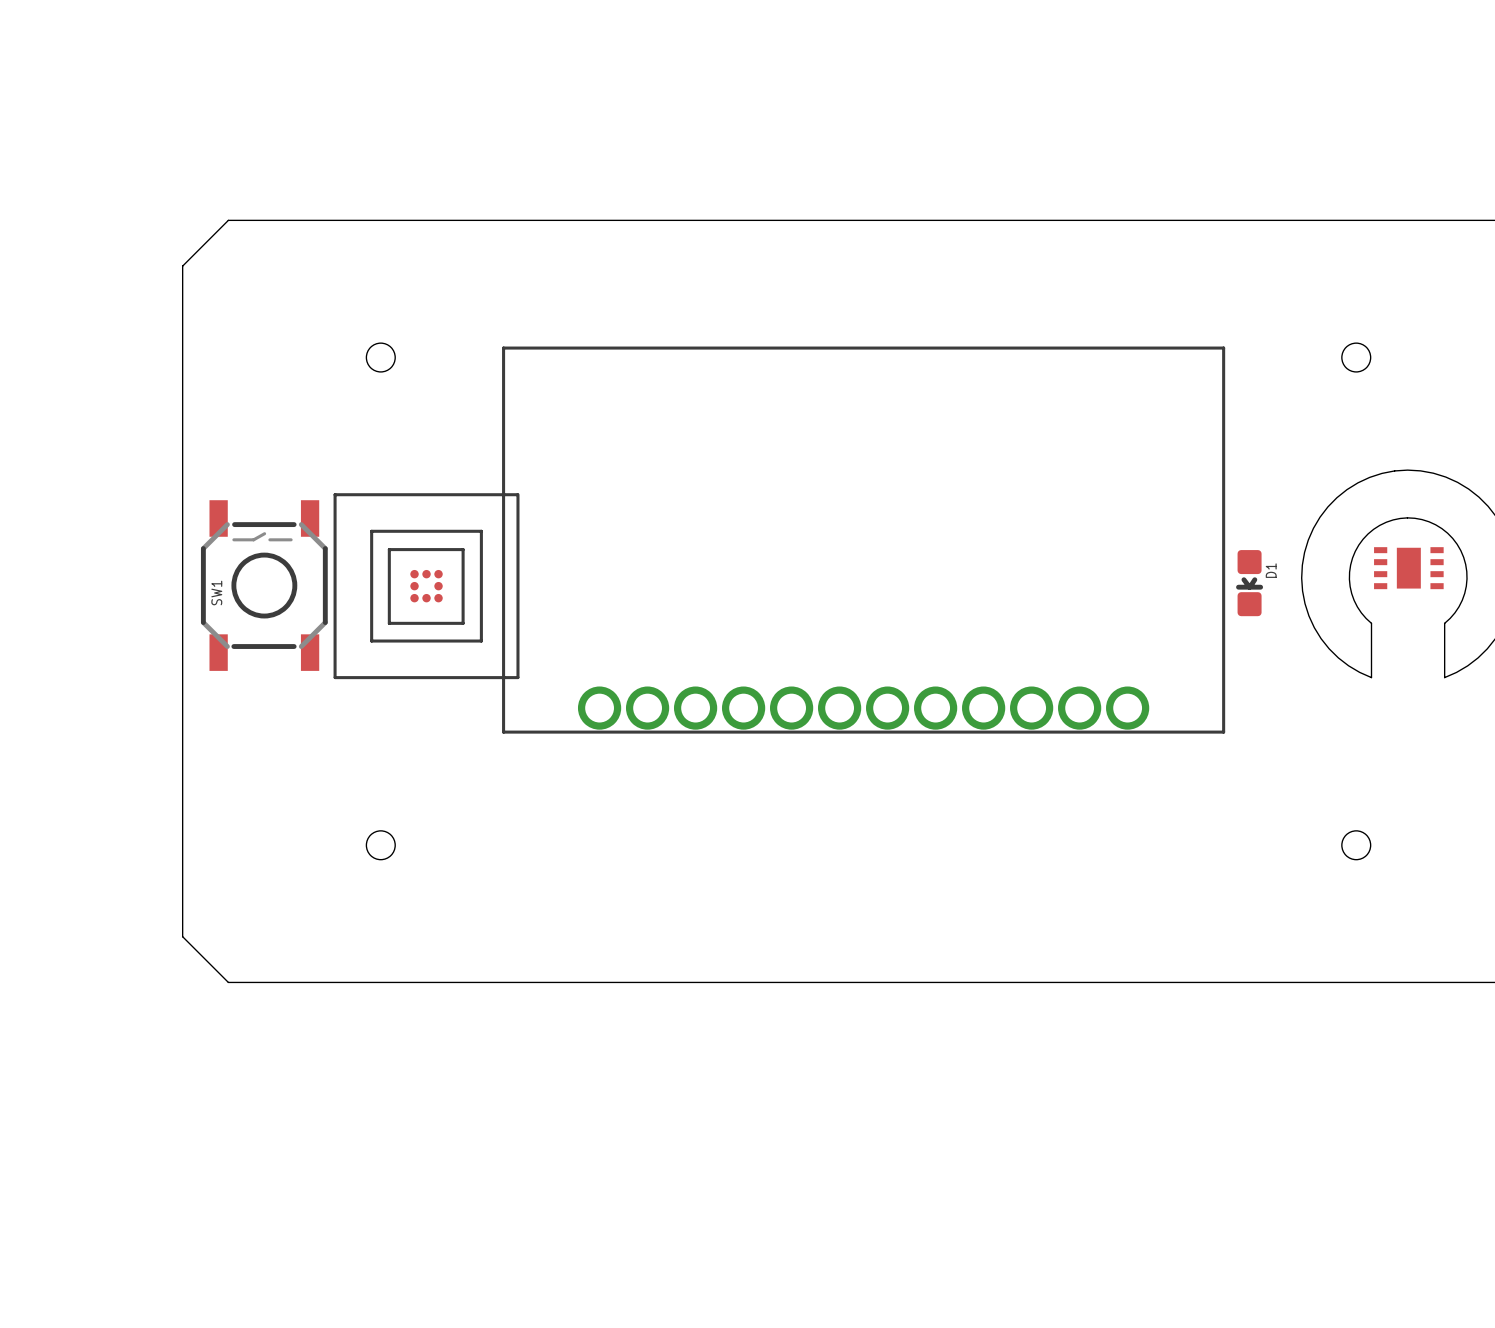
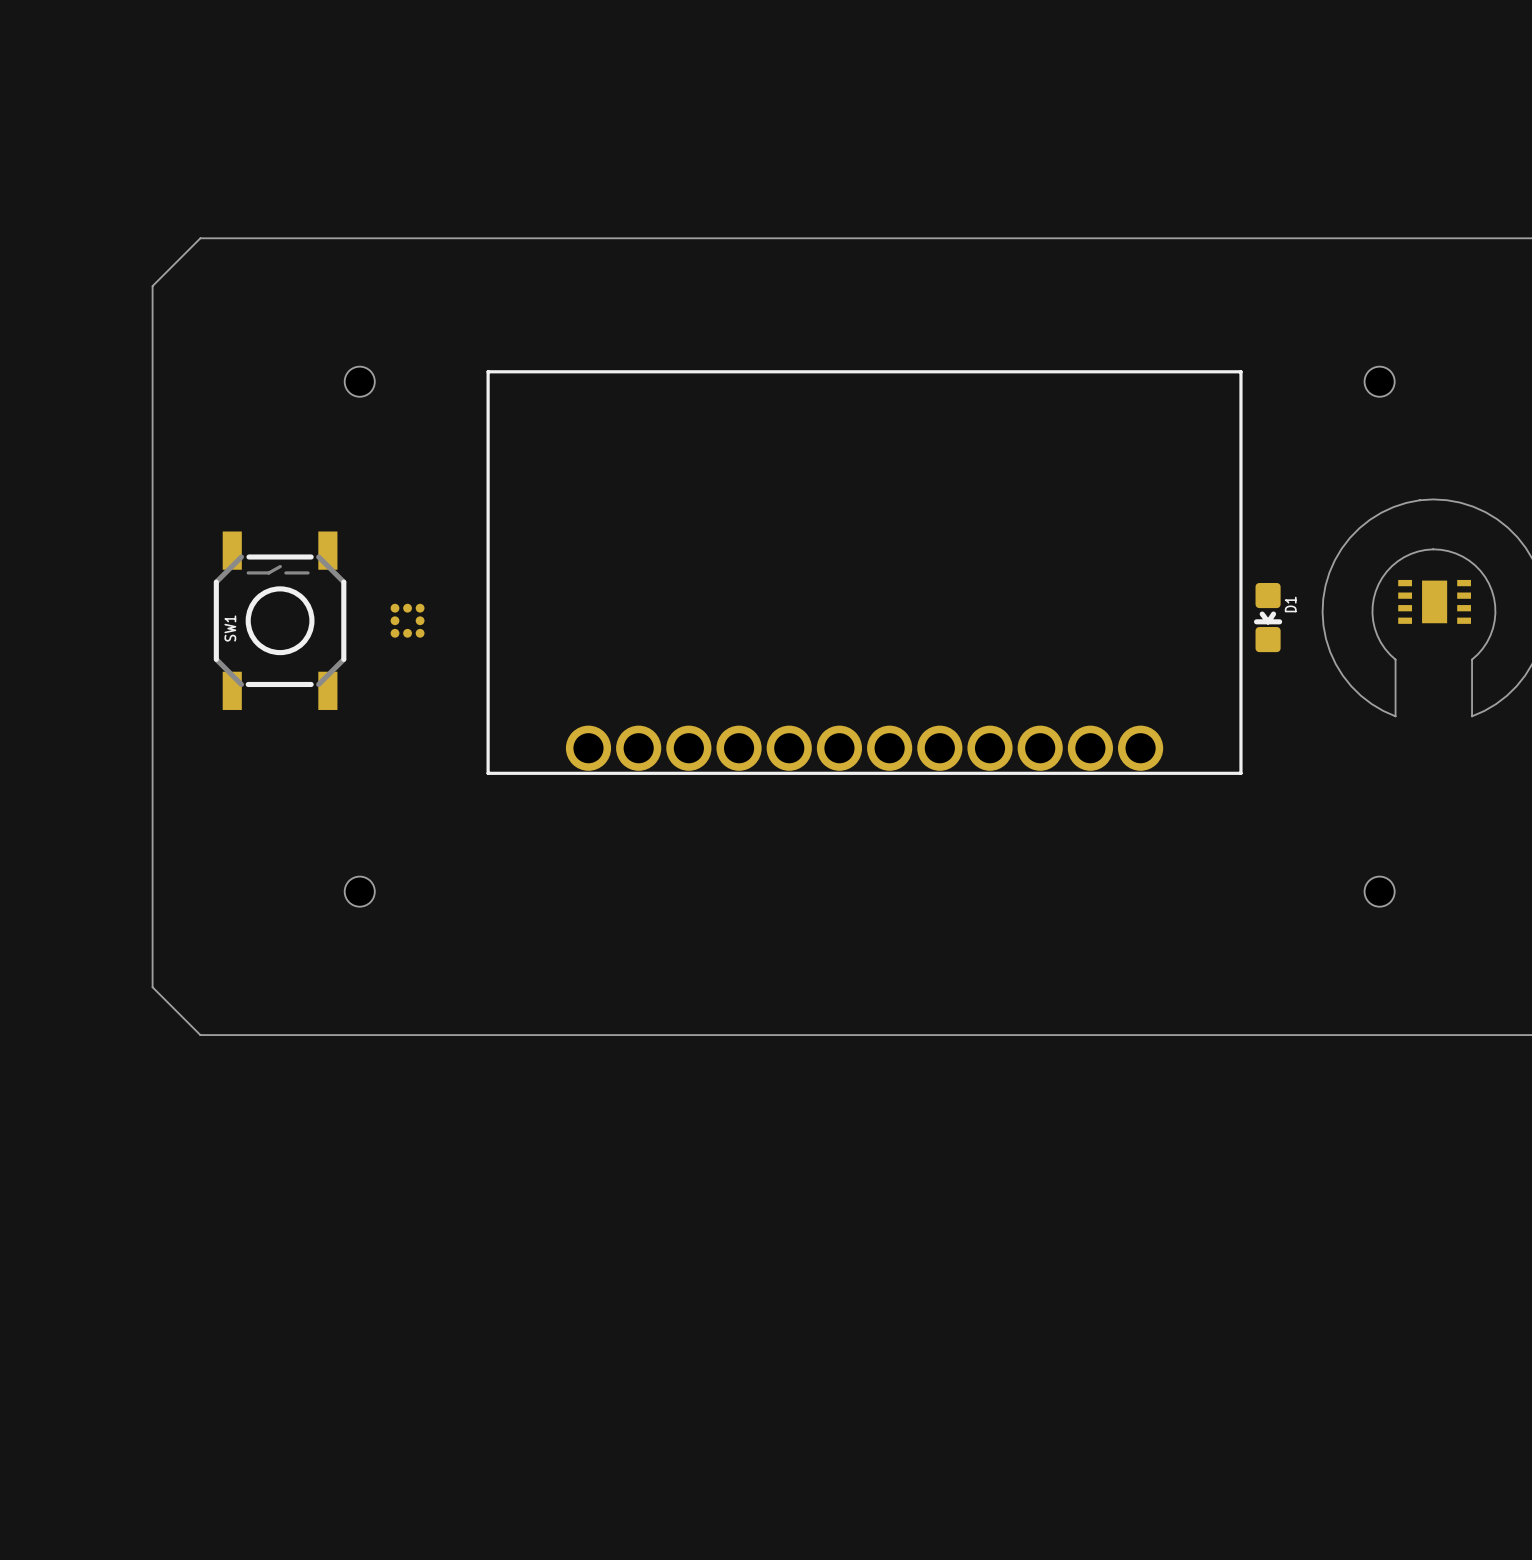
line: (517, 494) (335, 494) (335, 677) -> none
line: (517, 494) (517, 677) -> none
line: (371, 531) (481, 531) (481, 641) (371, 641) (371, 531) -> none
line: (389, 549) (463, 549) (463, 623) (389, 623) (389, 549) -> none
SW1 position: (264, 585) -> (280, 620)
line: (335, 677) (517, 677) -> none

